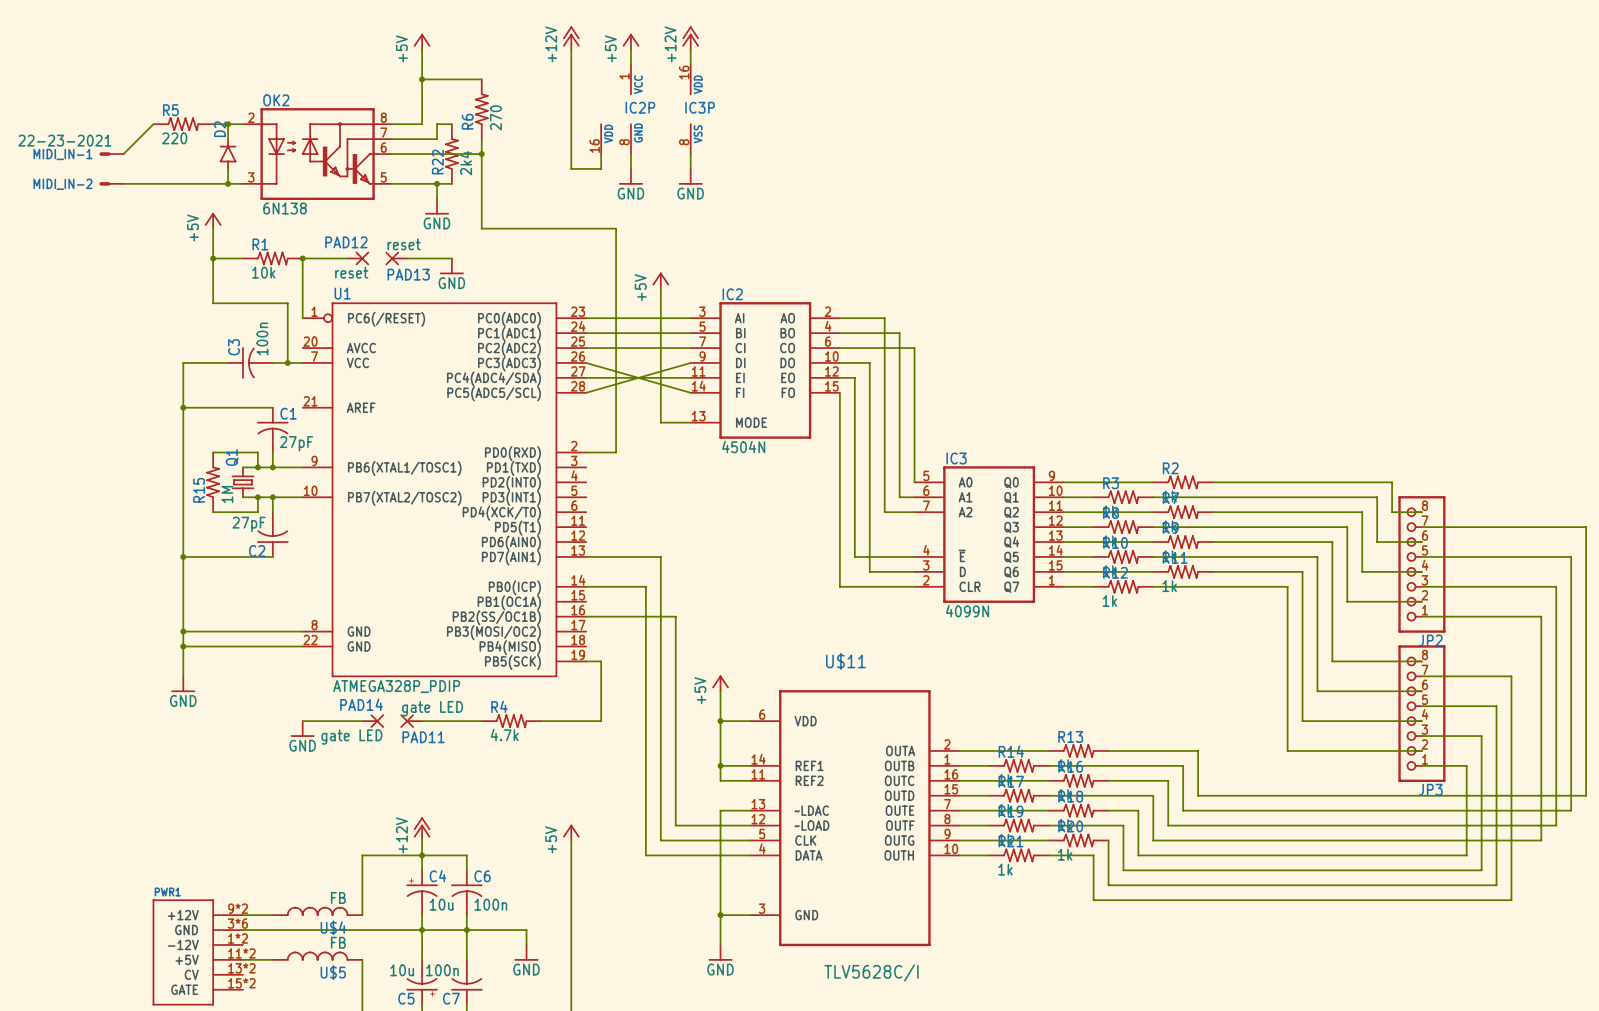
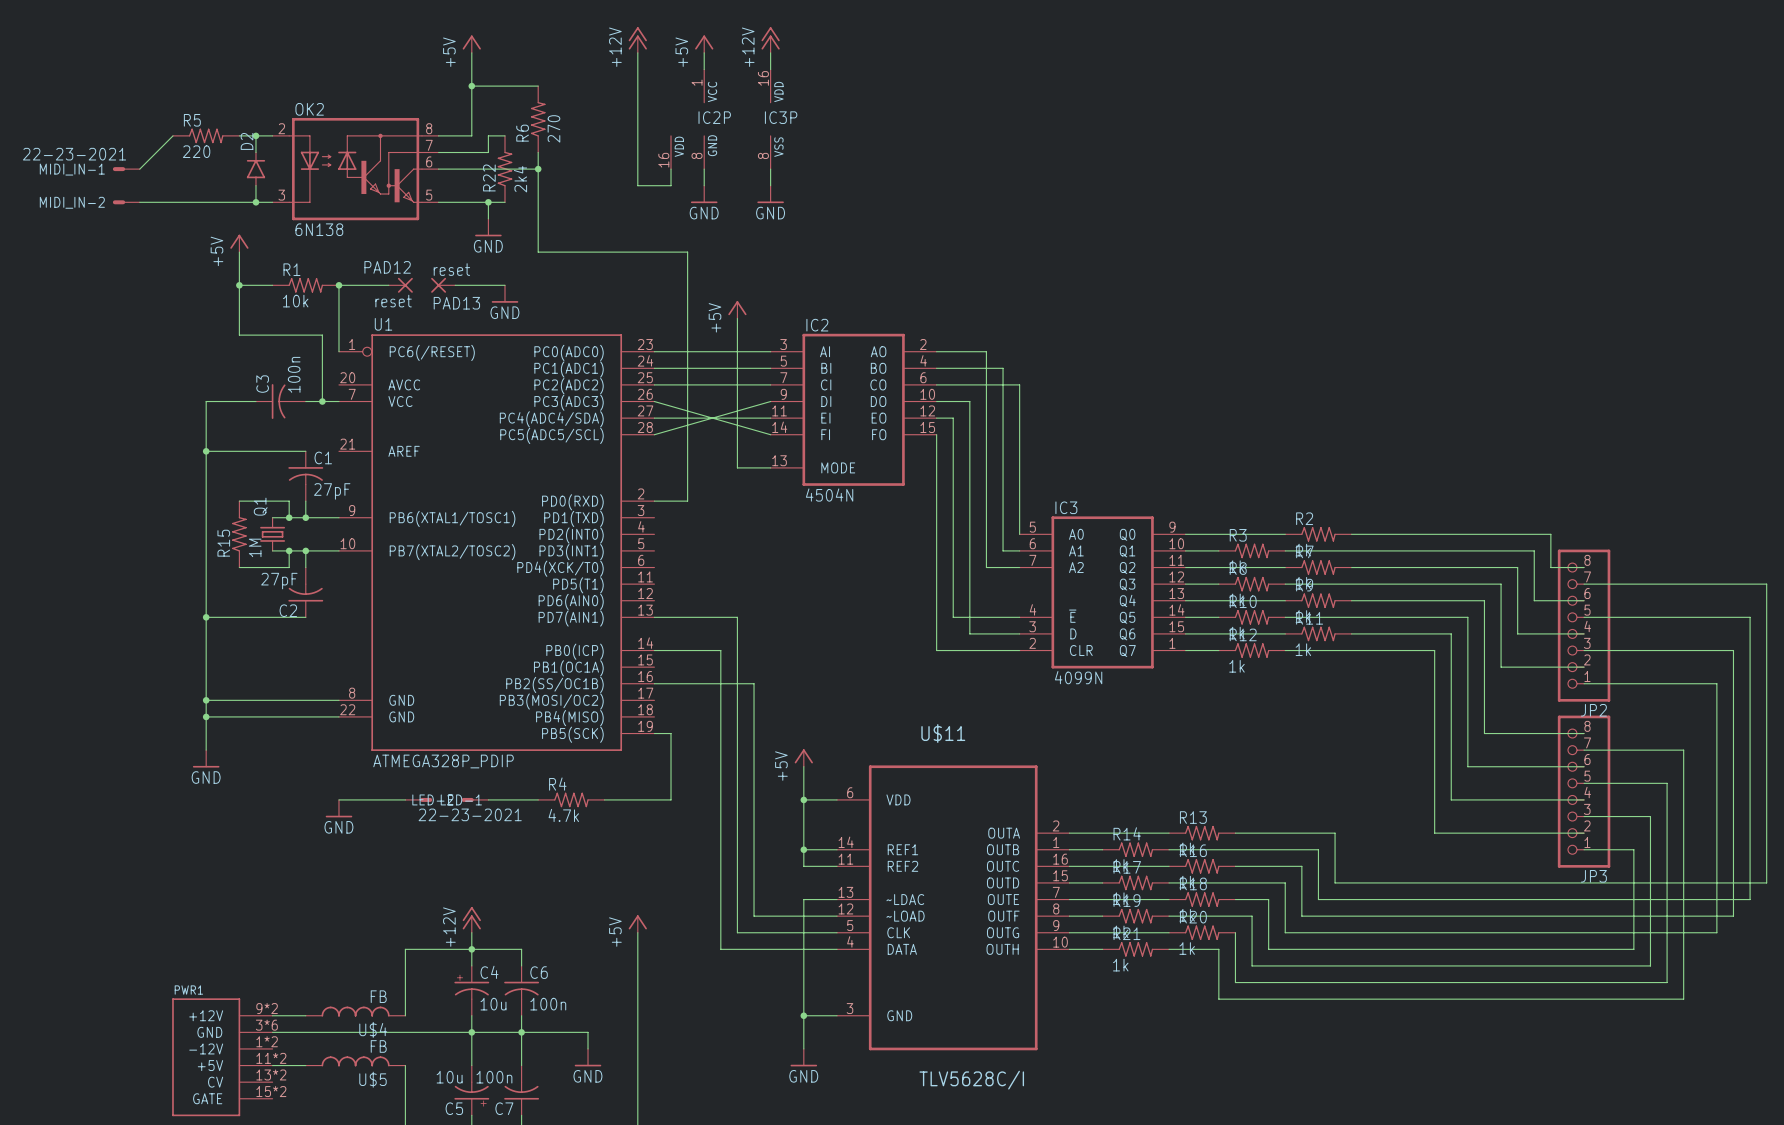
PAD14: gate LED (373, 721) -> none
LED-1: none -> 22-23-2021 (418, 799)
PAD11: gate LED (411, 721) -> none
LED-2: none -> (474, 799)

